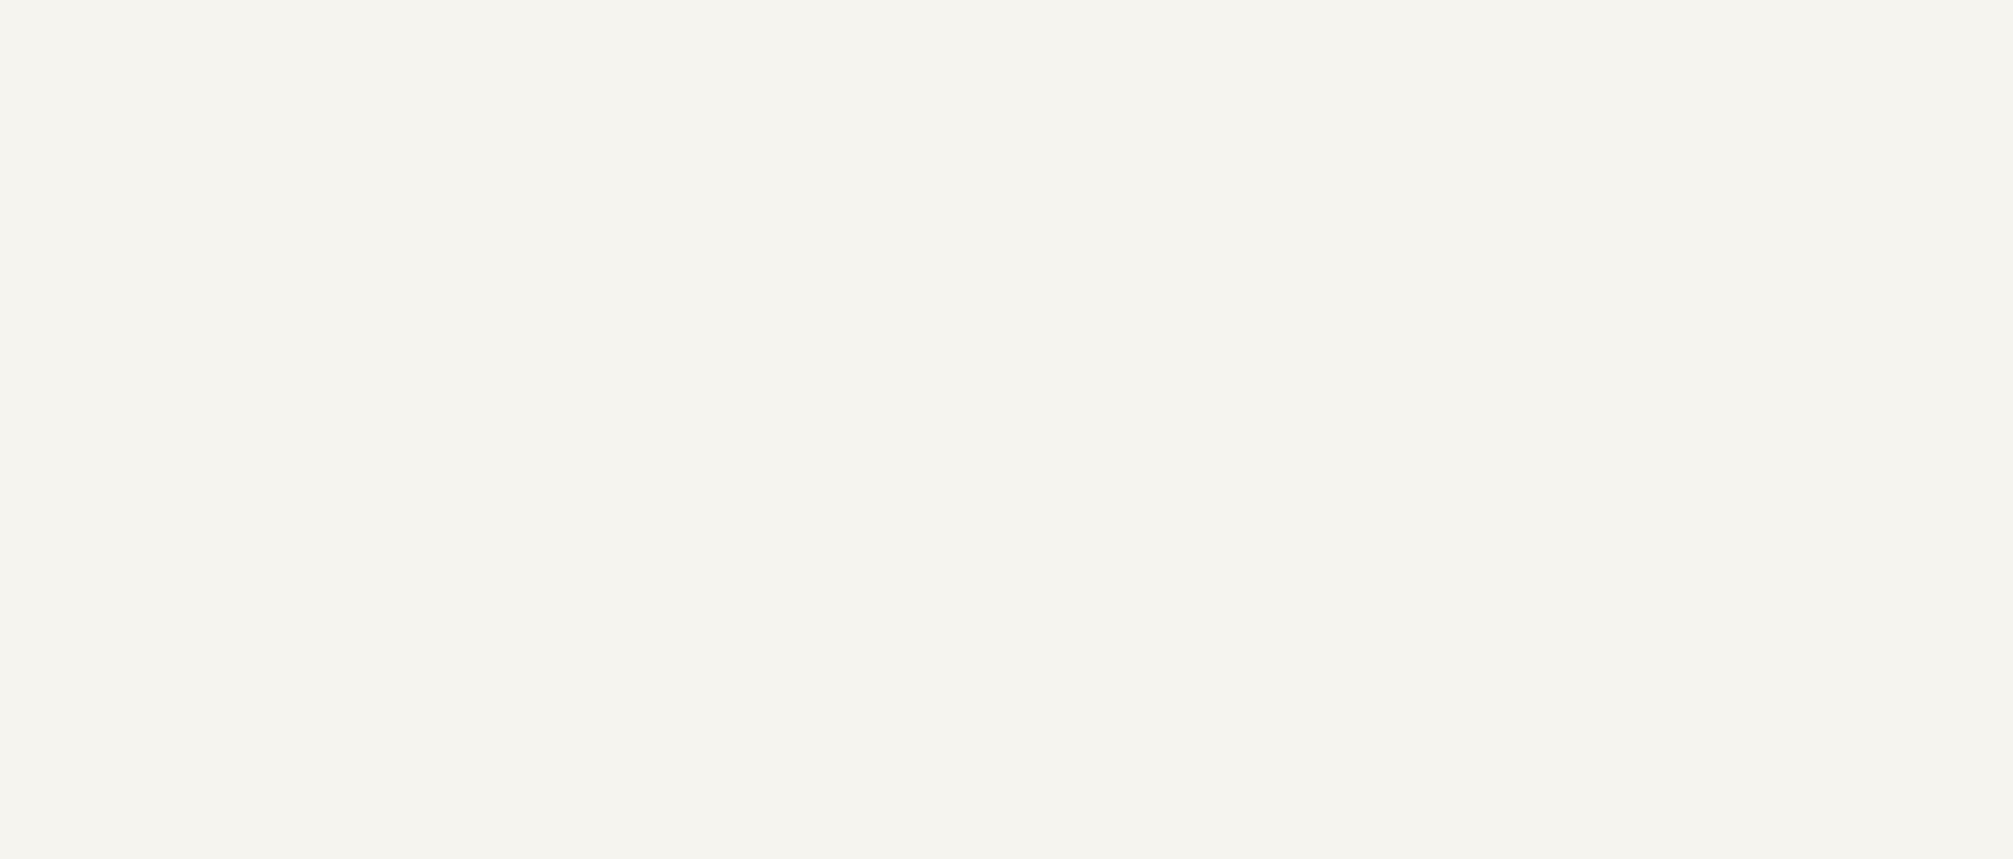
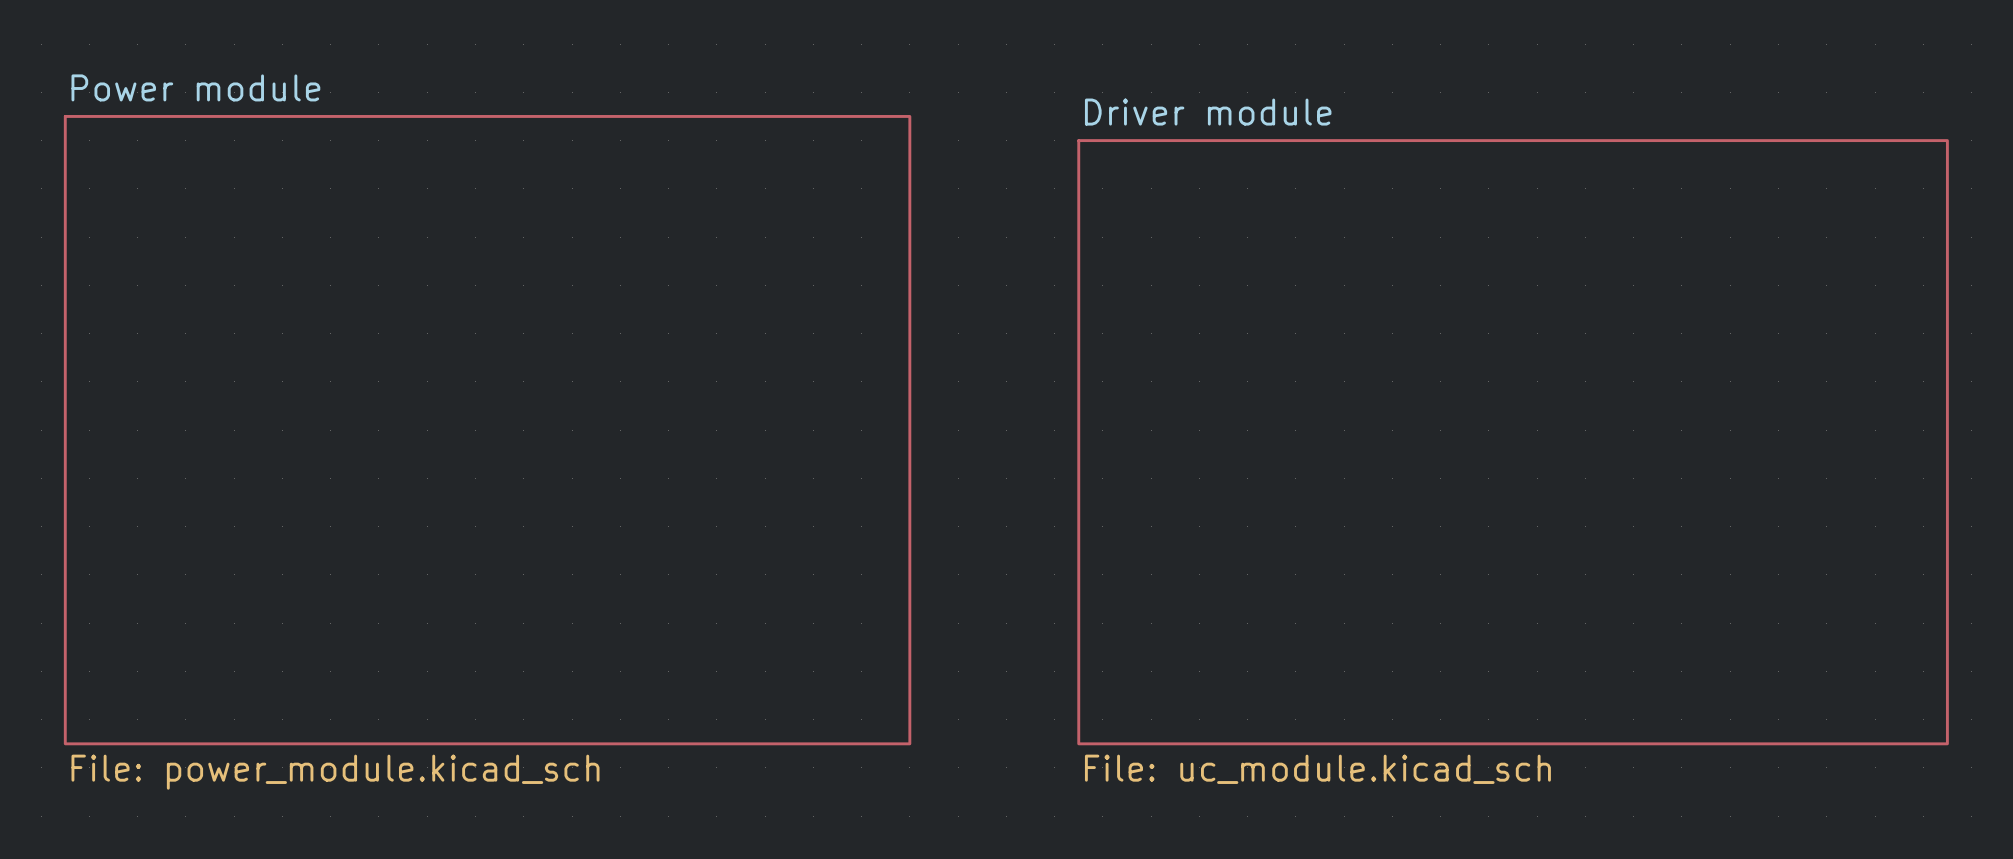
sheet Power module: none -> File: power_module.kicad_sch (487, 430)
sheet Driver module: none -> File: uc_module.kicad_sch (1513, 442)

